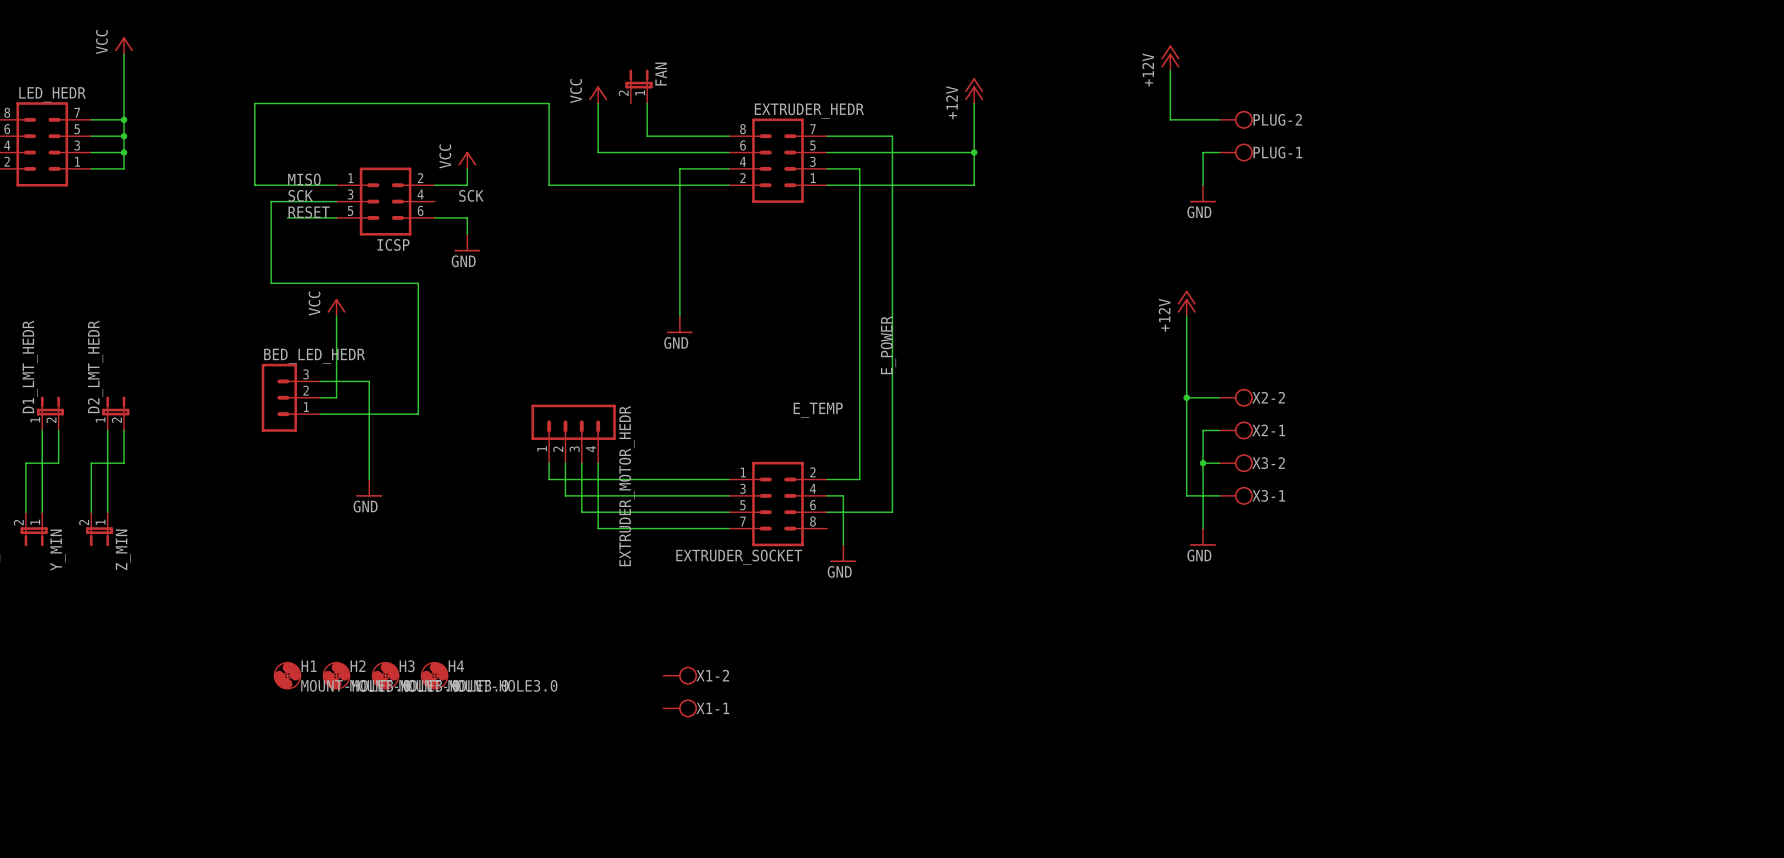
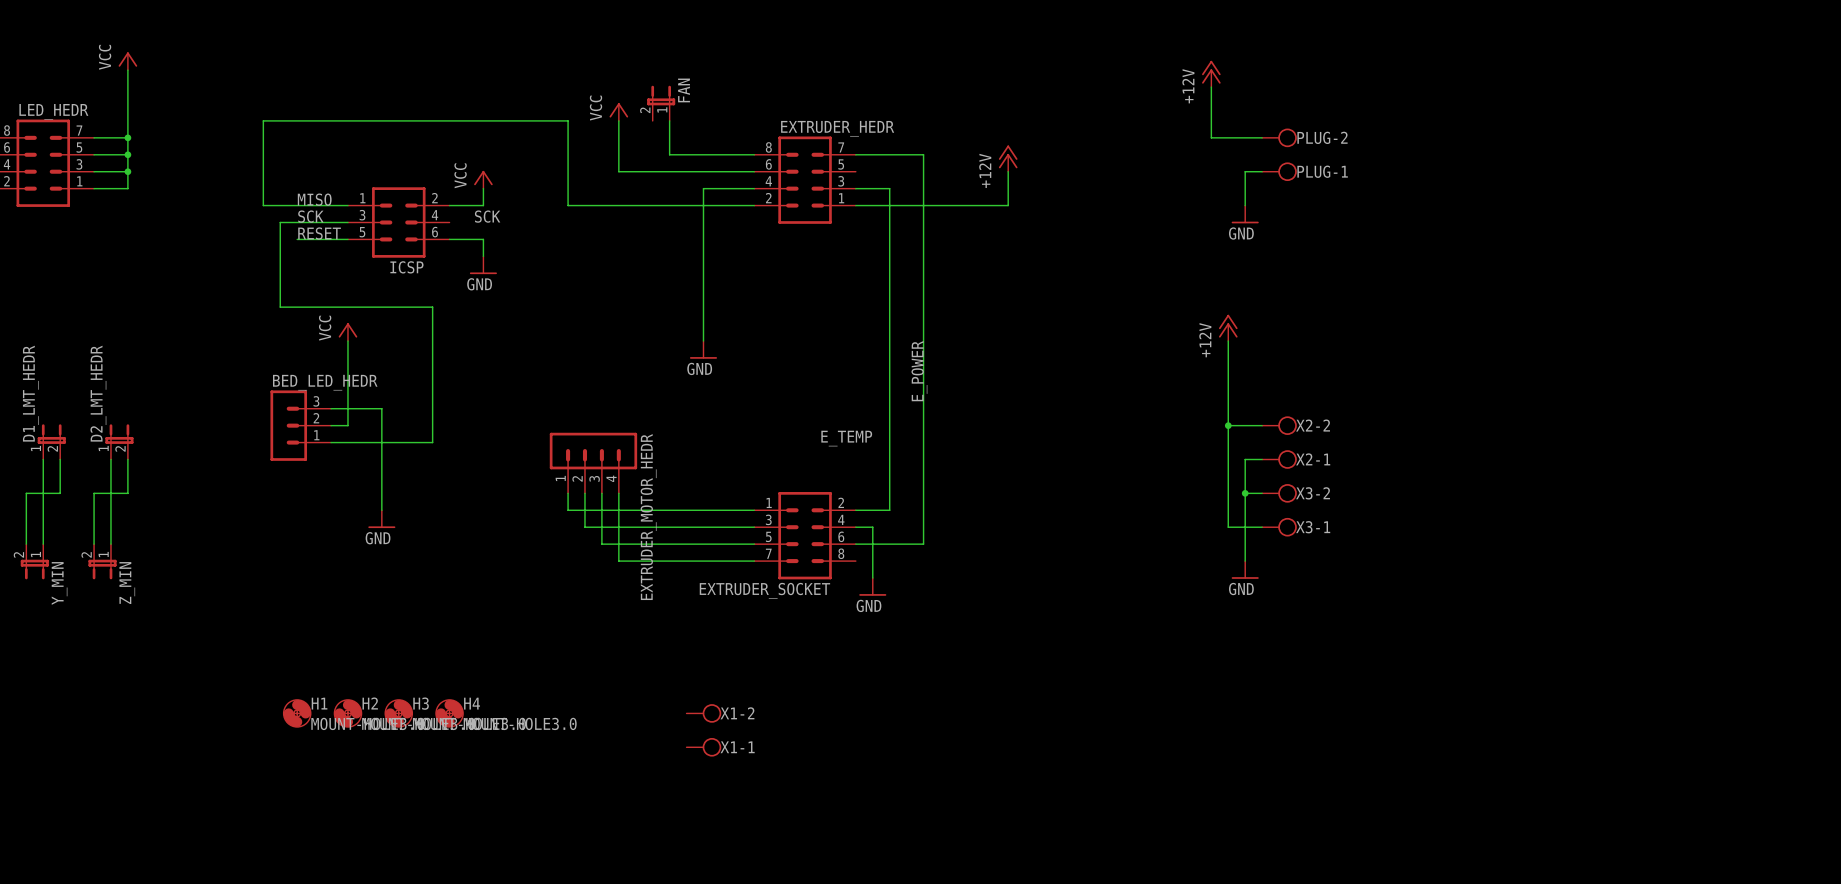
power symbol position: +12V (974, 90) -> +12V (1008, 158)
wire: (974, 103) (974, 152) (827, 152) -> none
junction: (974, 152) -> none

